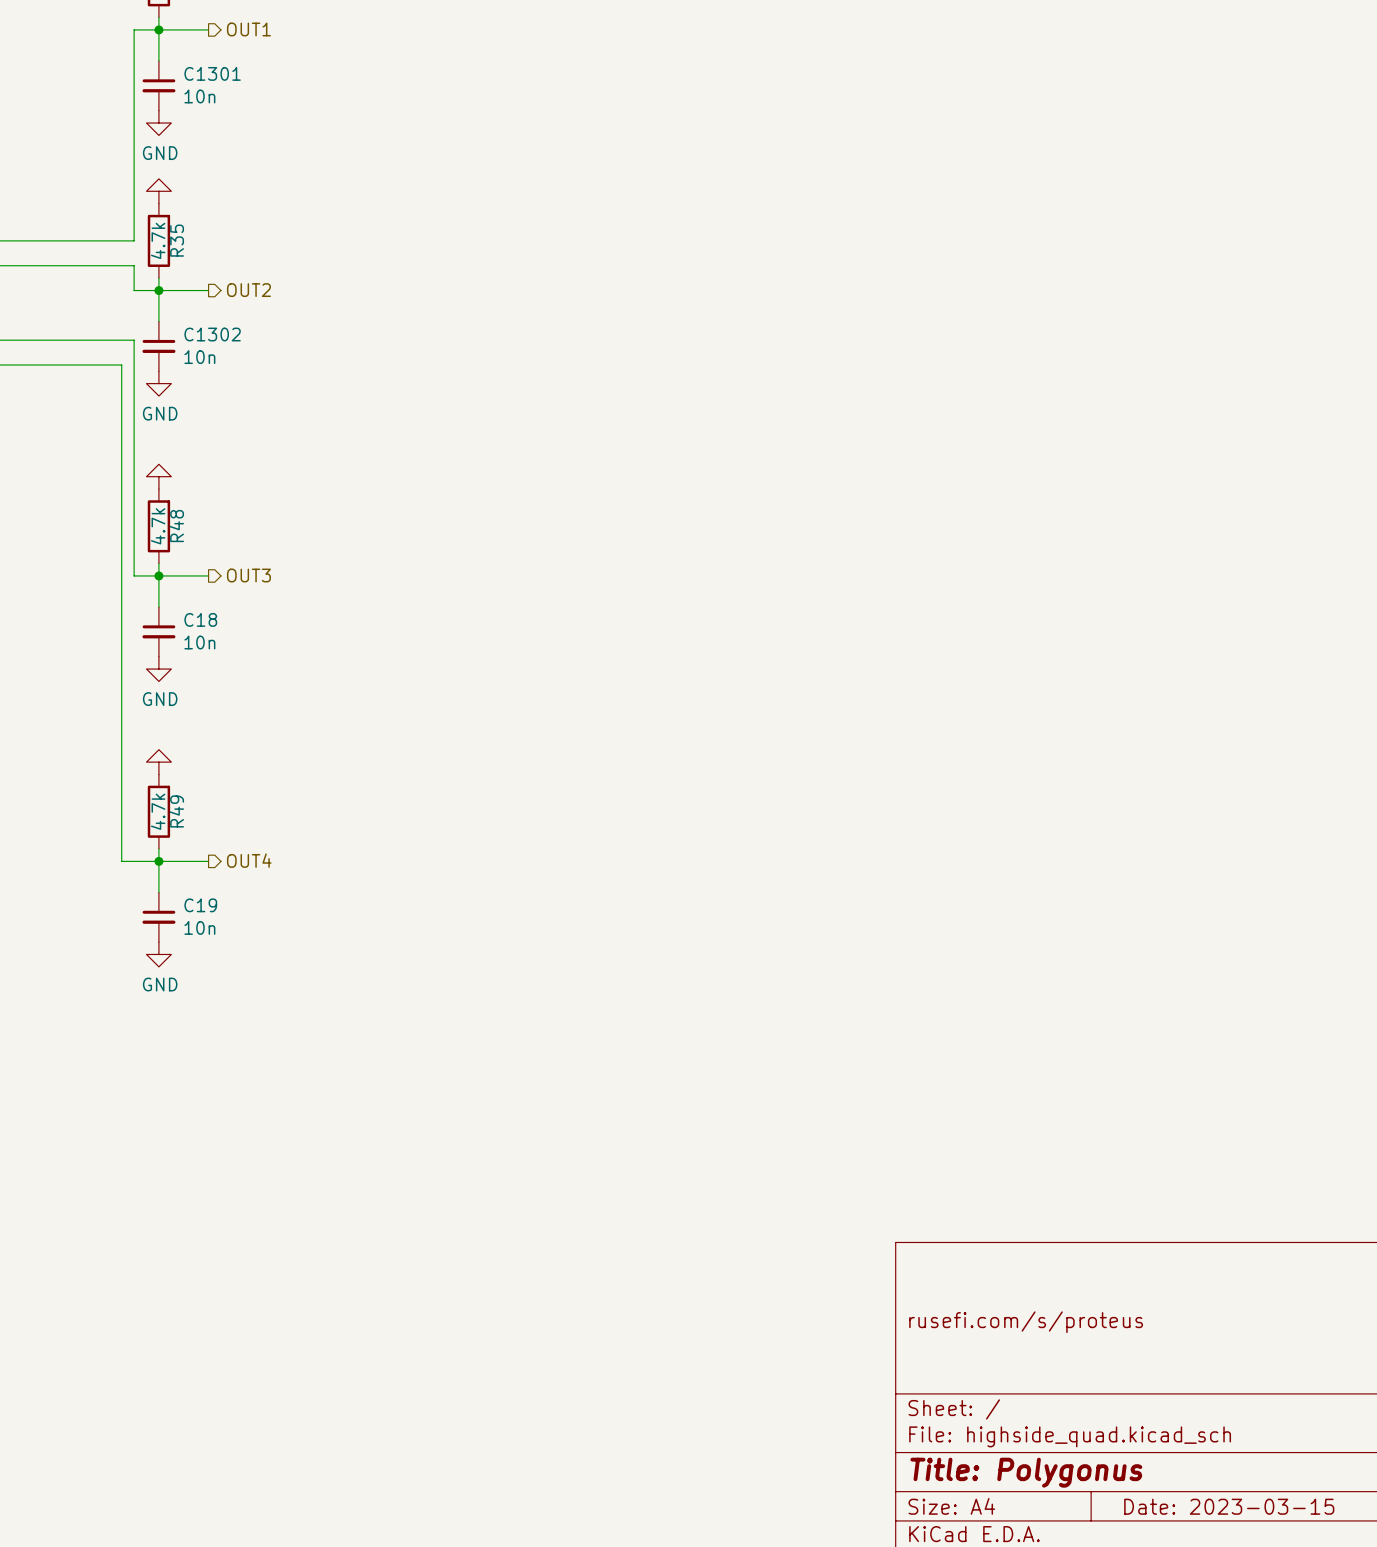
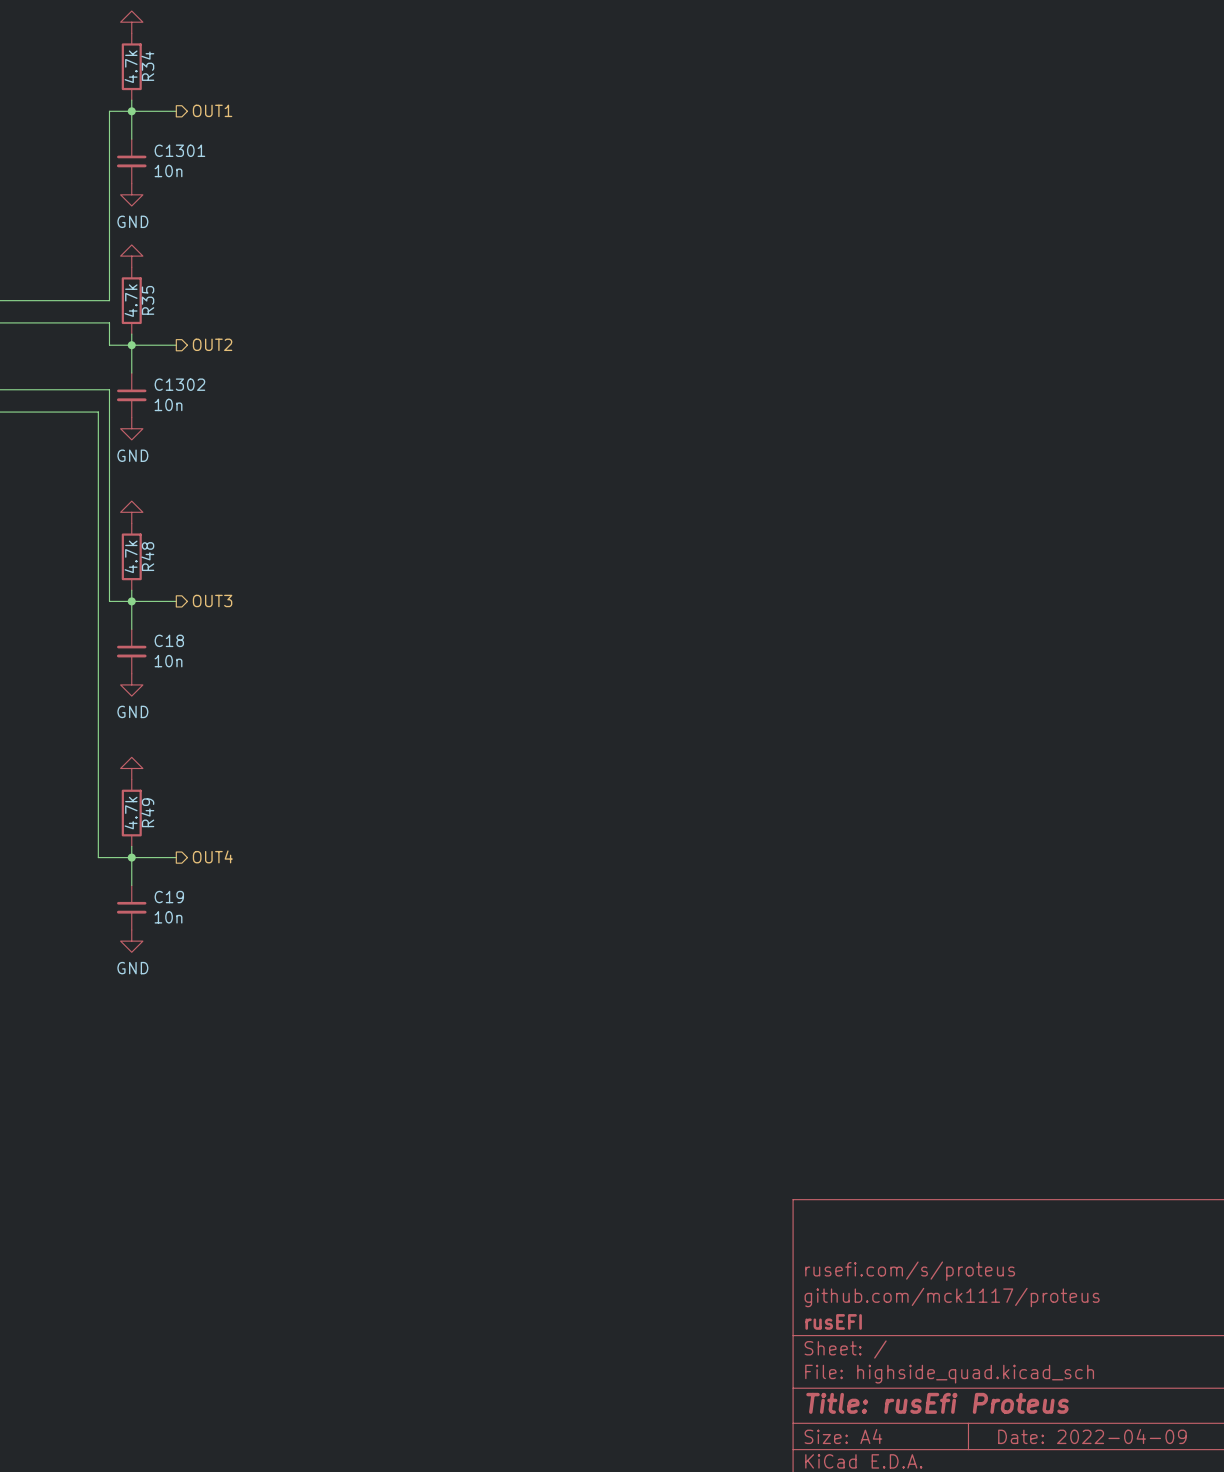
title block: none -> github.com/mck1117/proteus (952, 1297)
title block: none -> rusEFI (833, 1321)
title block: Title: Polygonus (1026, 1472) -> Title: rusEfi Proteus (937, 1403)
title block: Date: 2023-03-15 (1229, 1506) -> Date: 2022-04-09 (1092, 1436)

